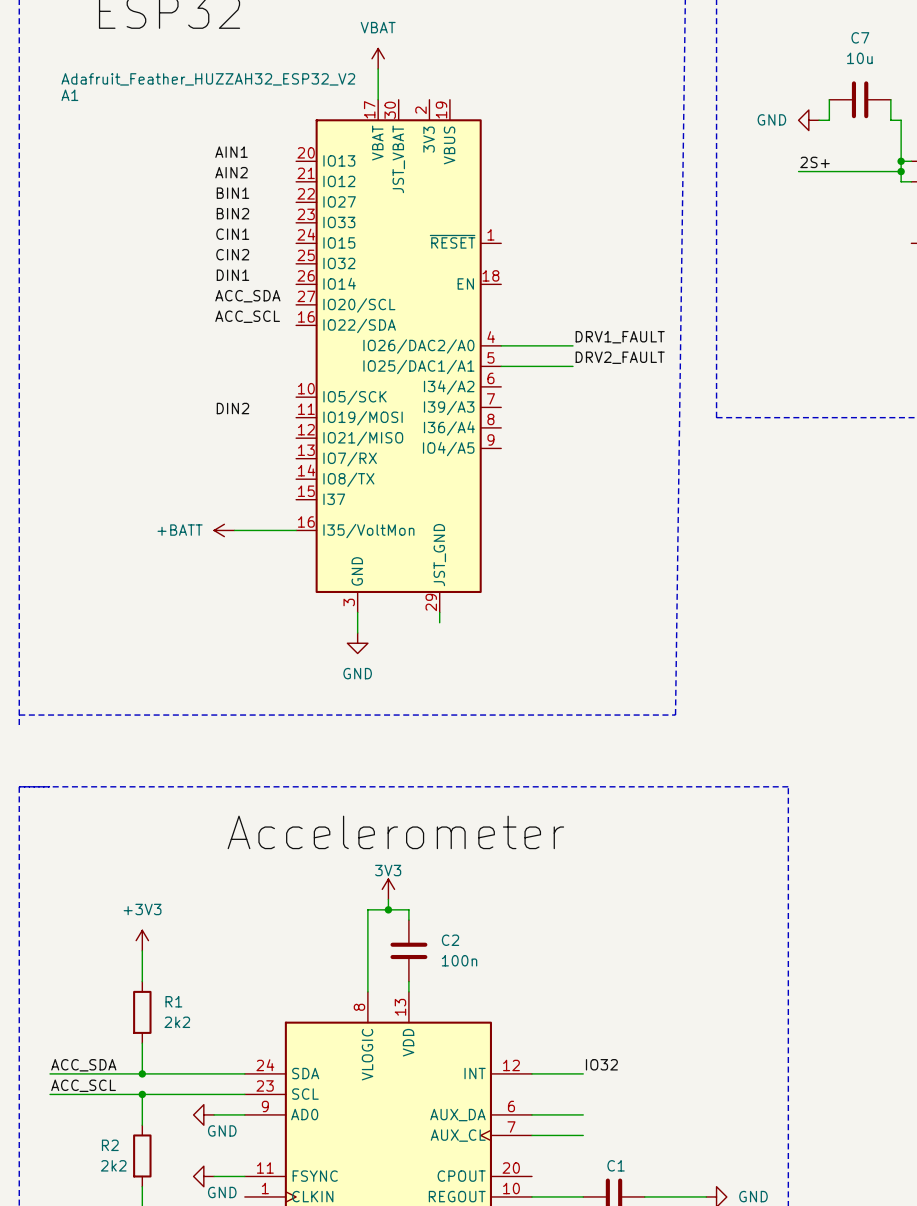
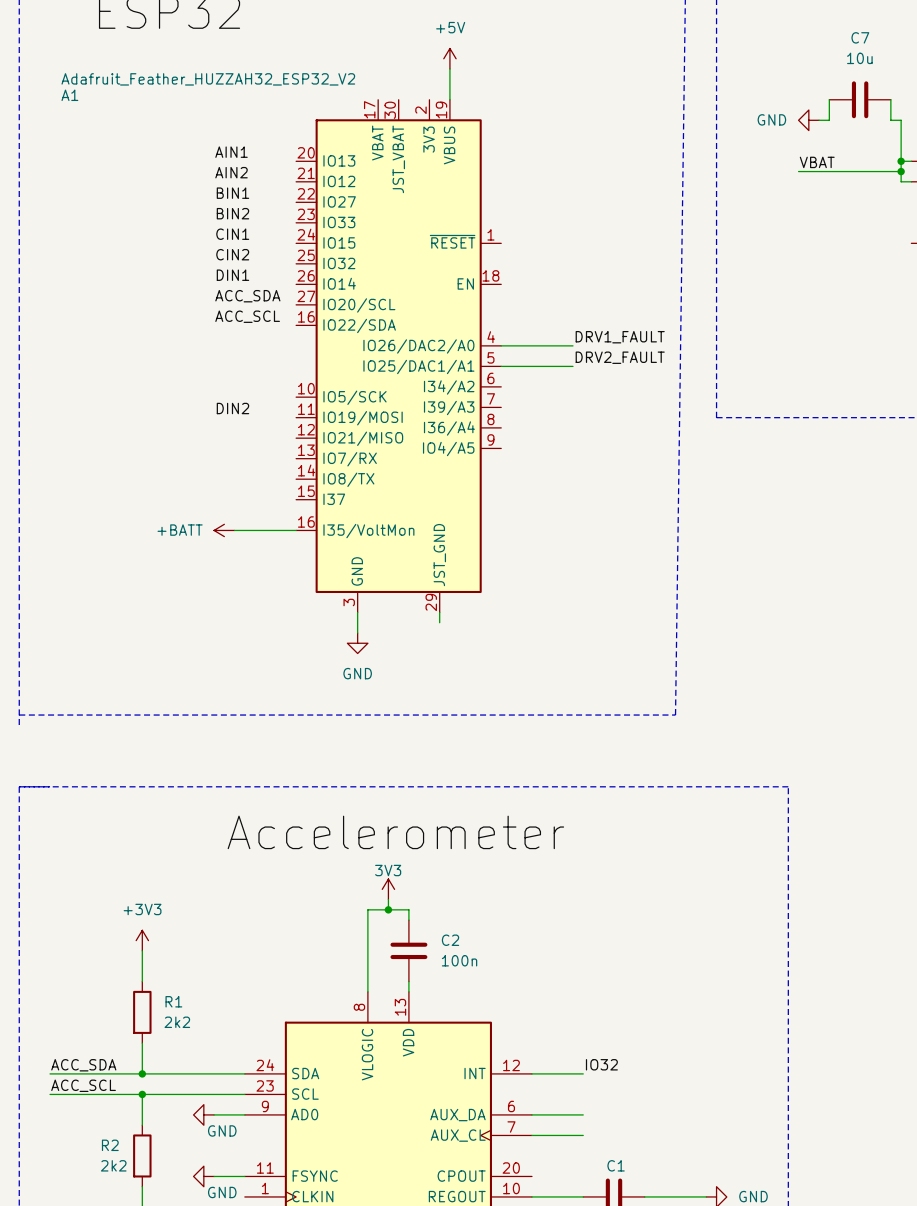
power symbol: VBAT (378, 58) -> none
power symbol: none -> +5V (449, 58)
wire: (378, 69) (378, 99) -> (449, 69) (449, 99)
label: 2S+ (815, 162) -> VBAT (817, 162)

